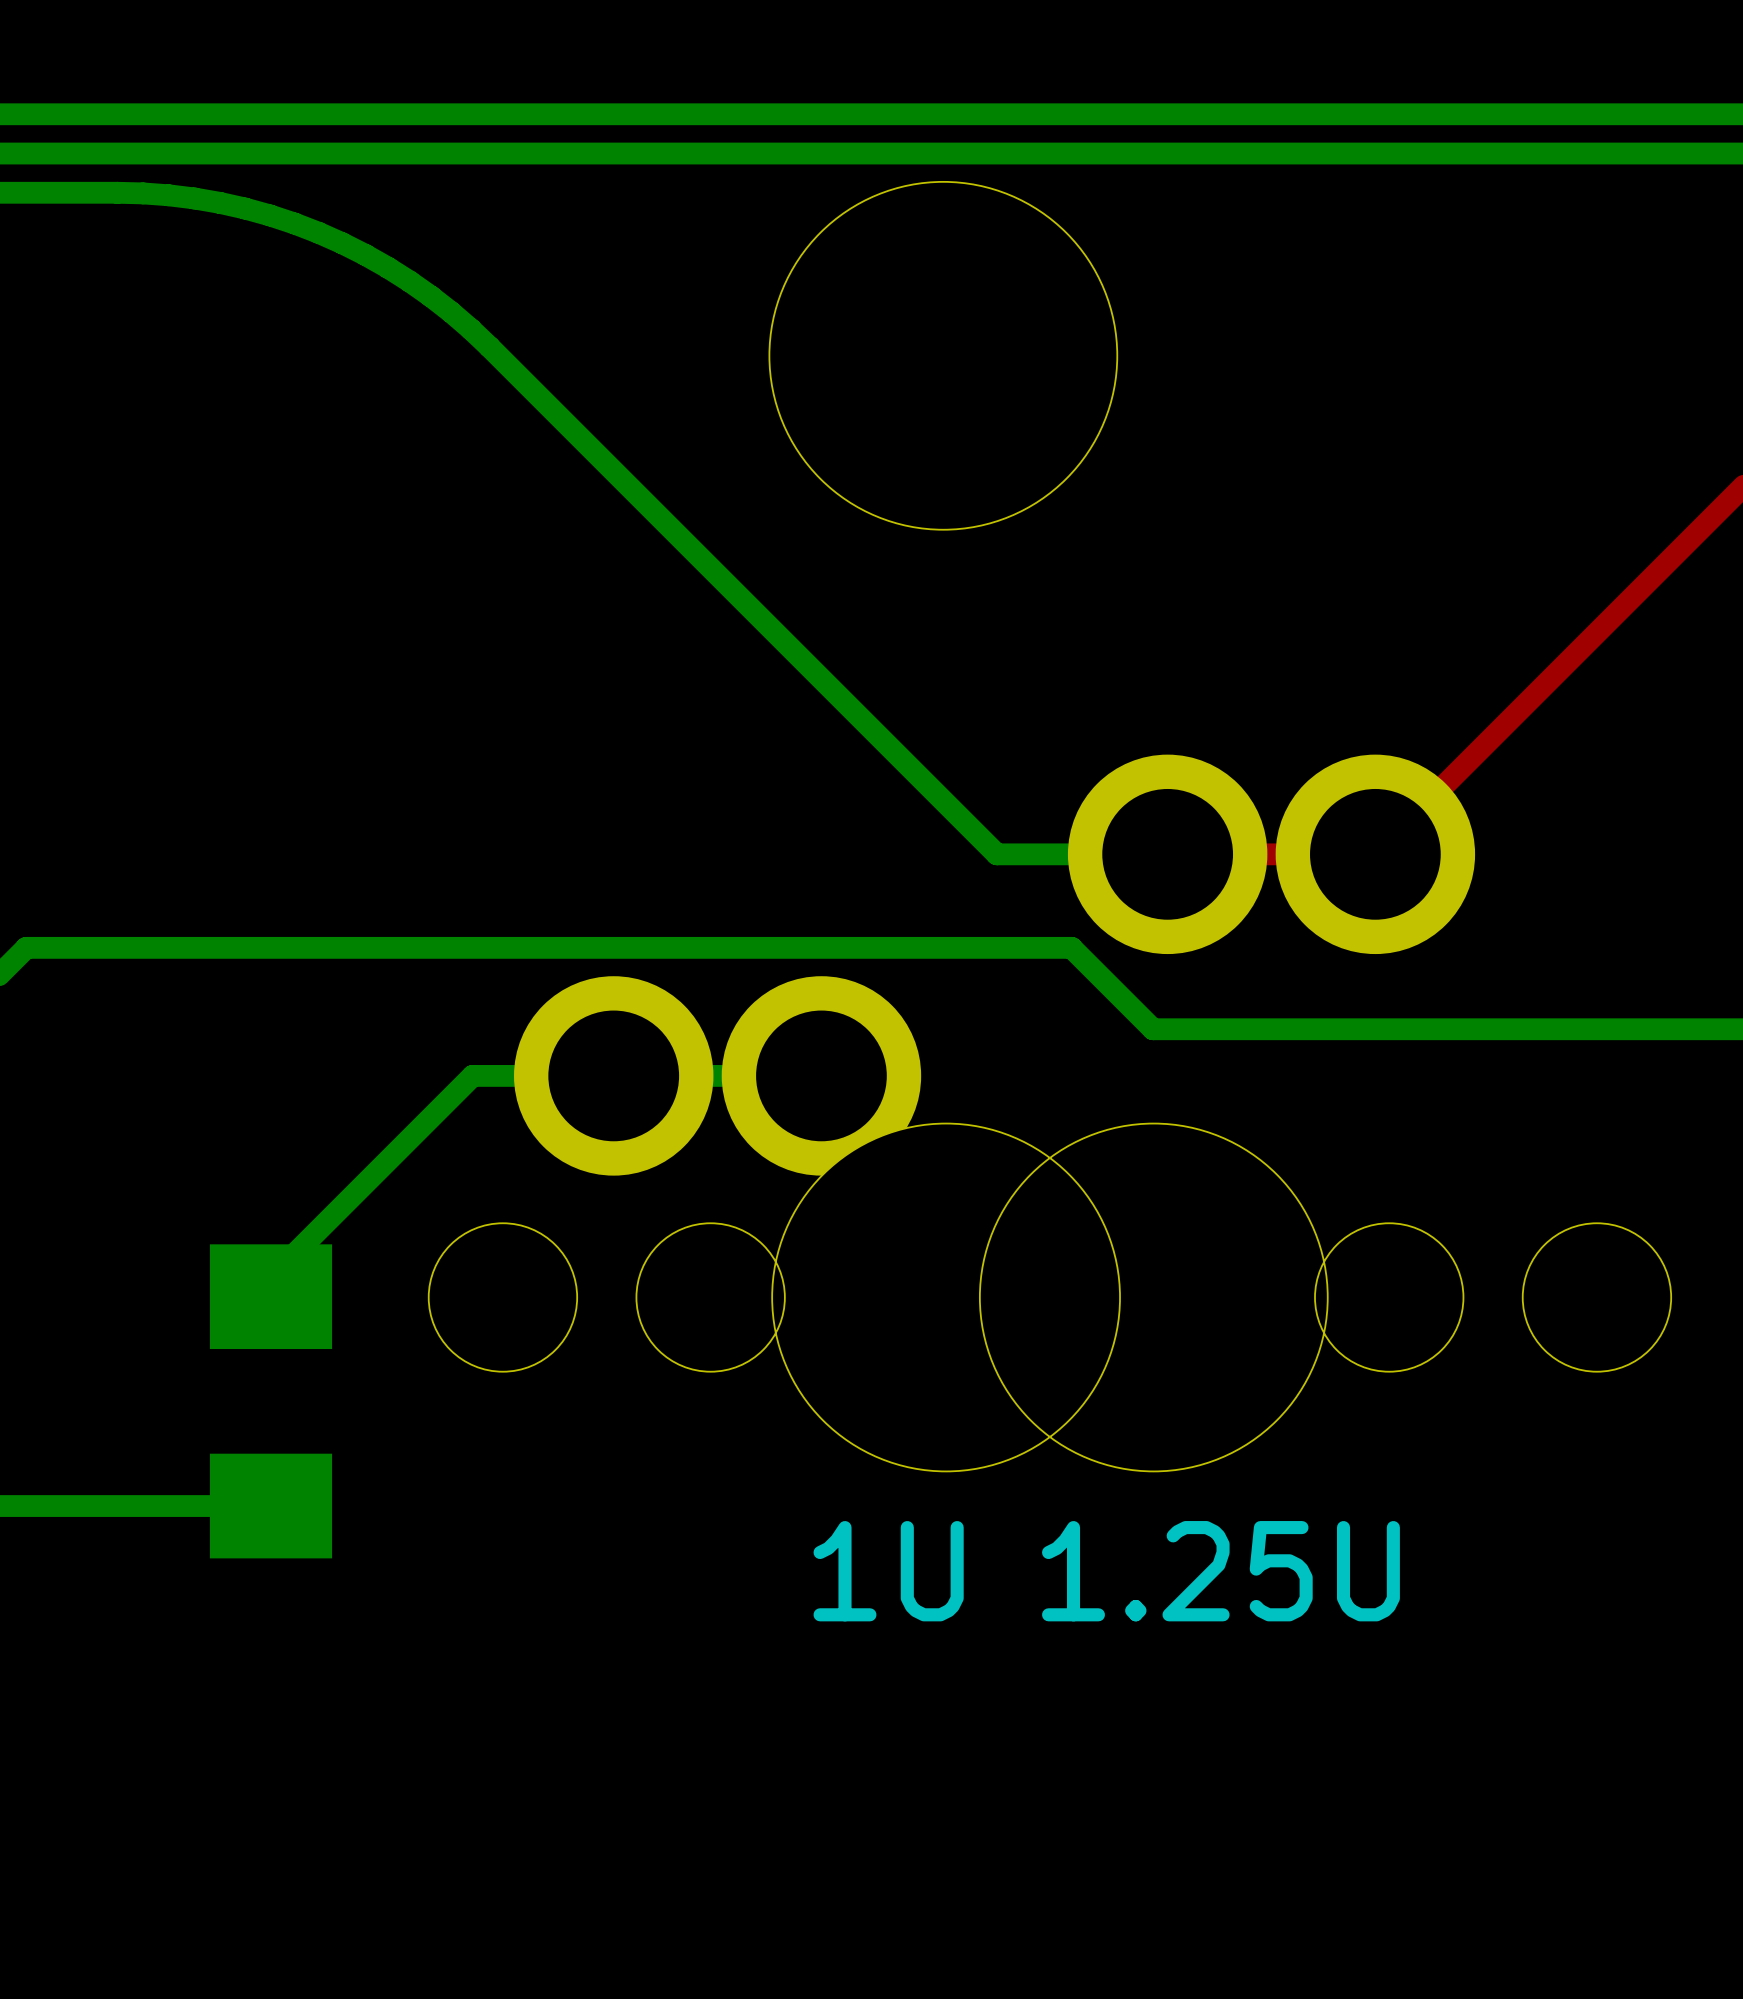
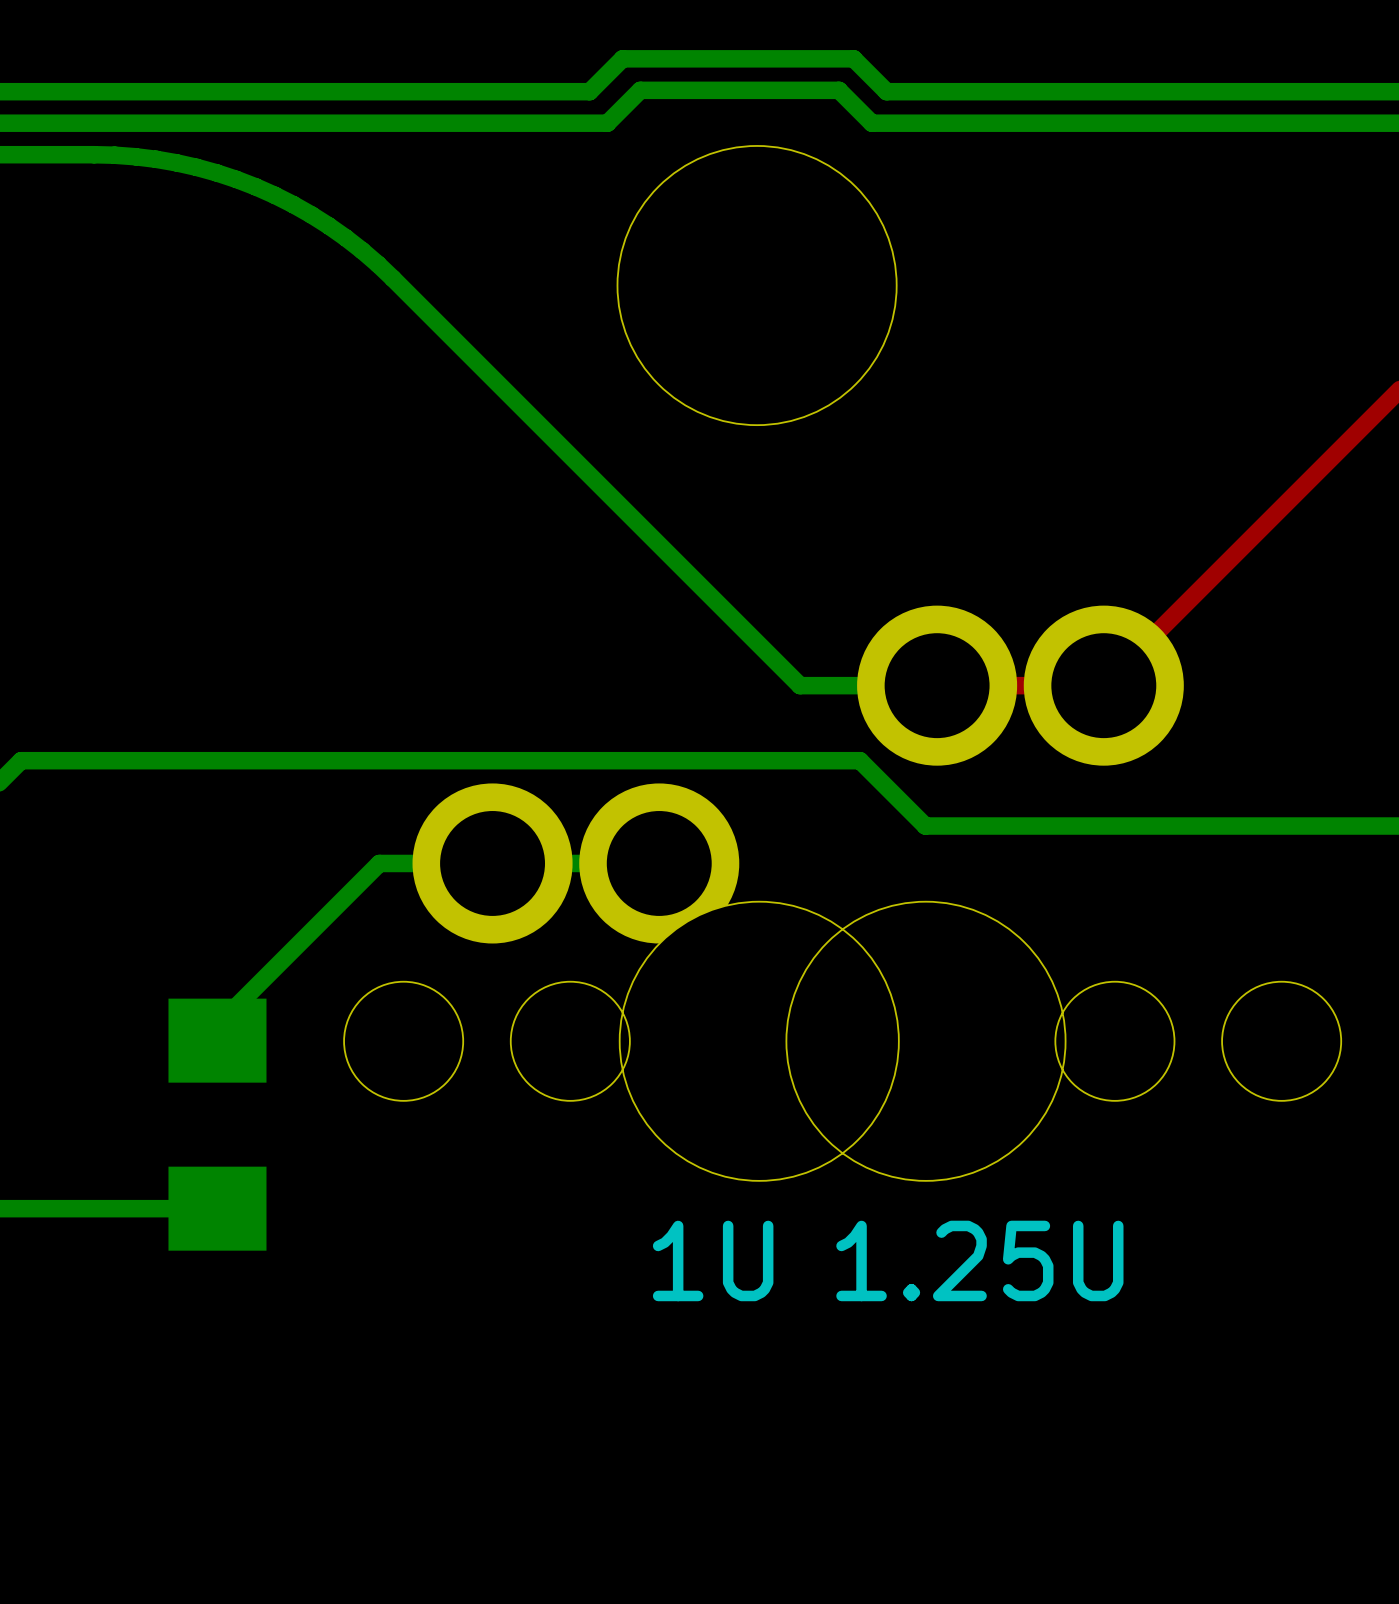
bottom track: (734, 114) (1104, 114) -> (589, 91) (622, 58) (853, 58) (886, 91)
bottom track: (756, 153) (1086, 153) -> (607, 123) (640, 90) (839, 90) (871, 123)

